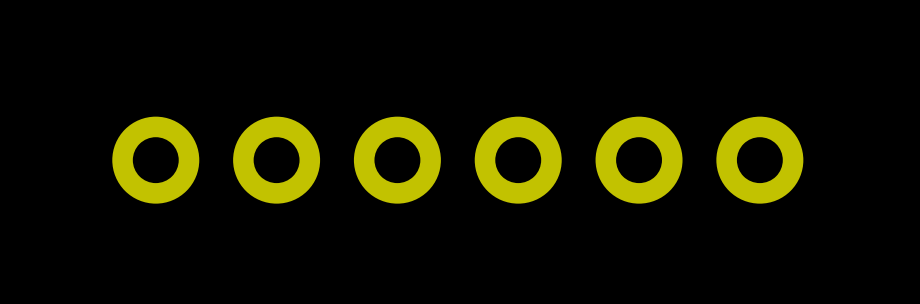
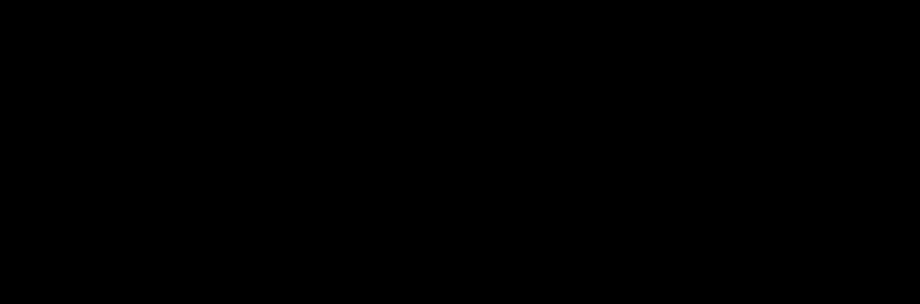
part: (457, 160) -> none

